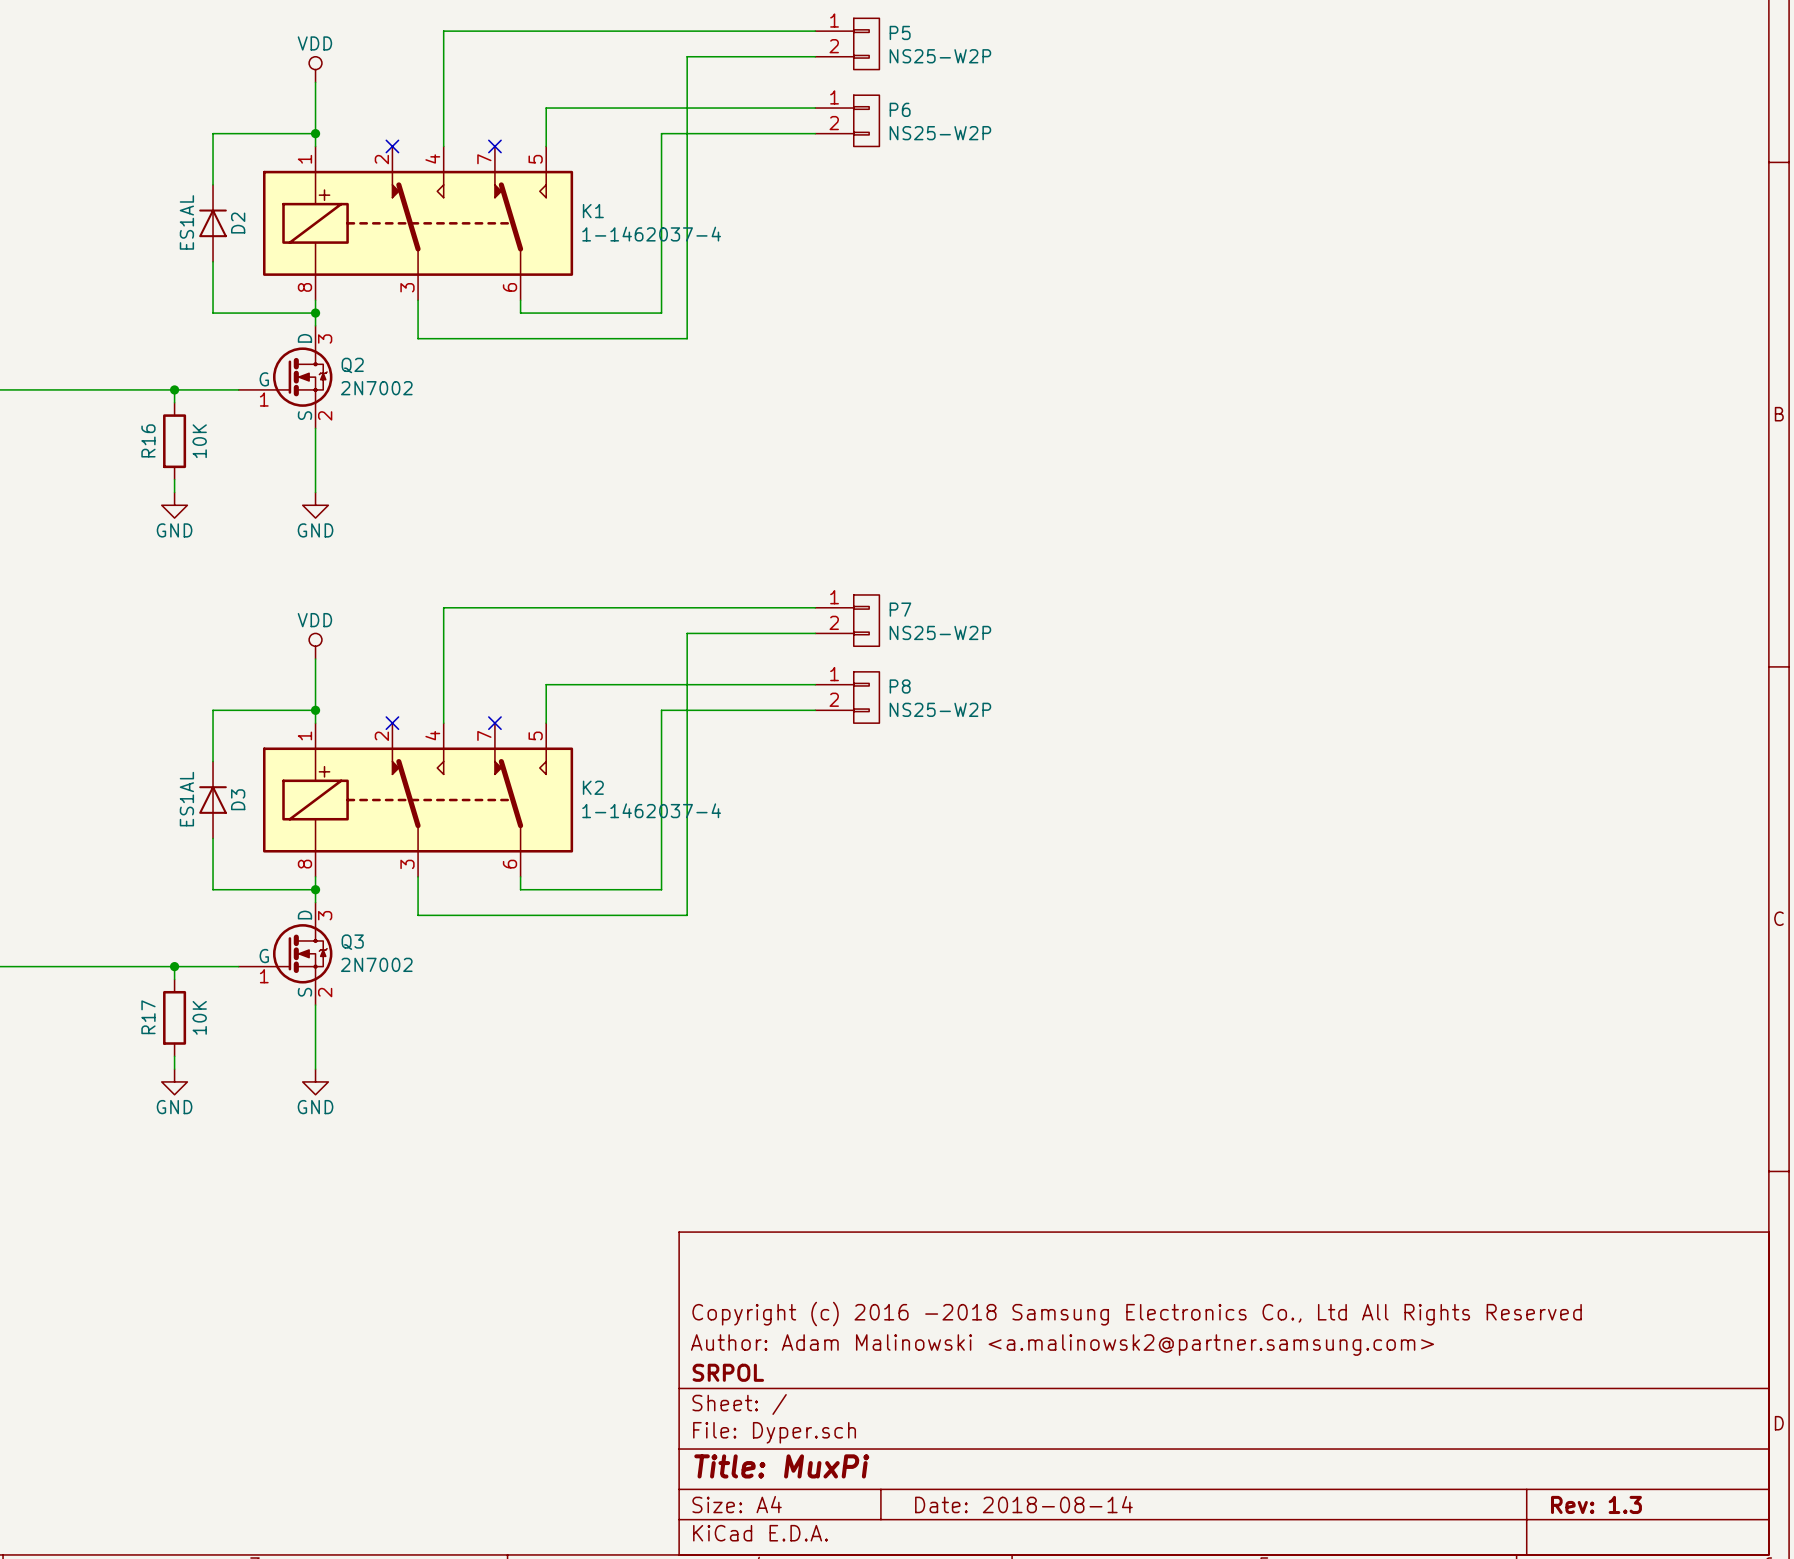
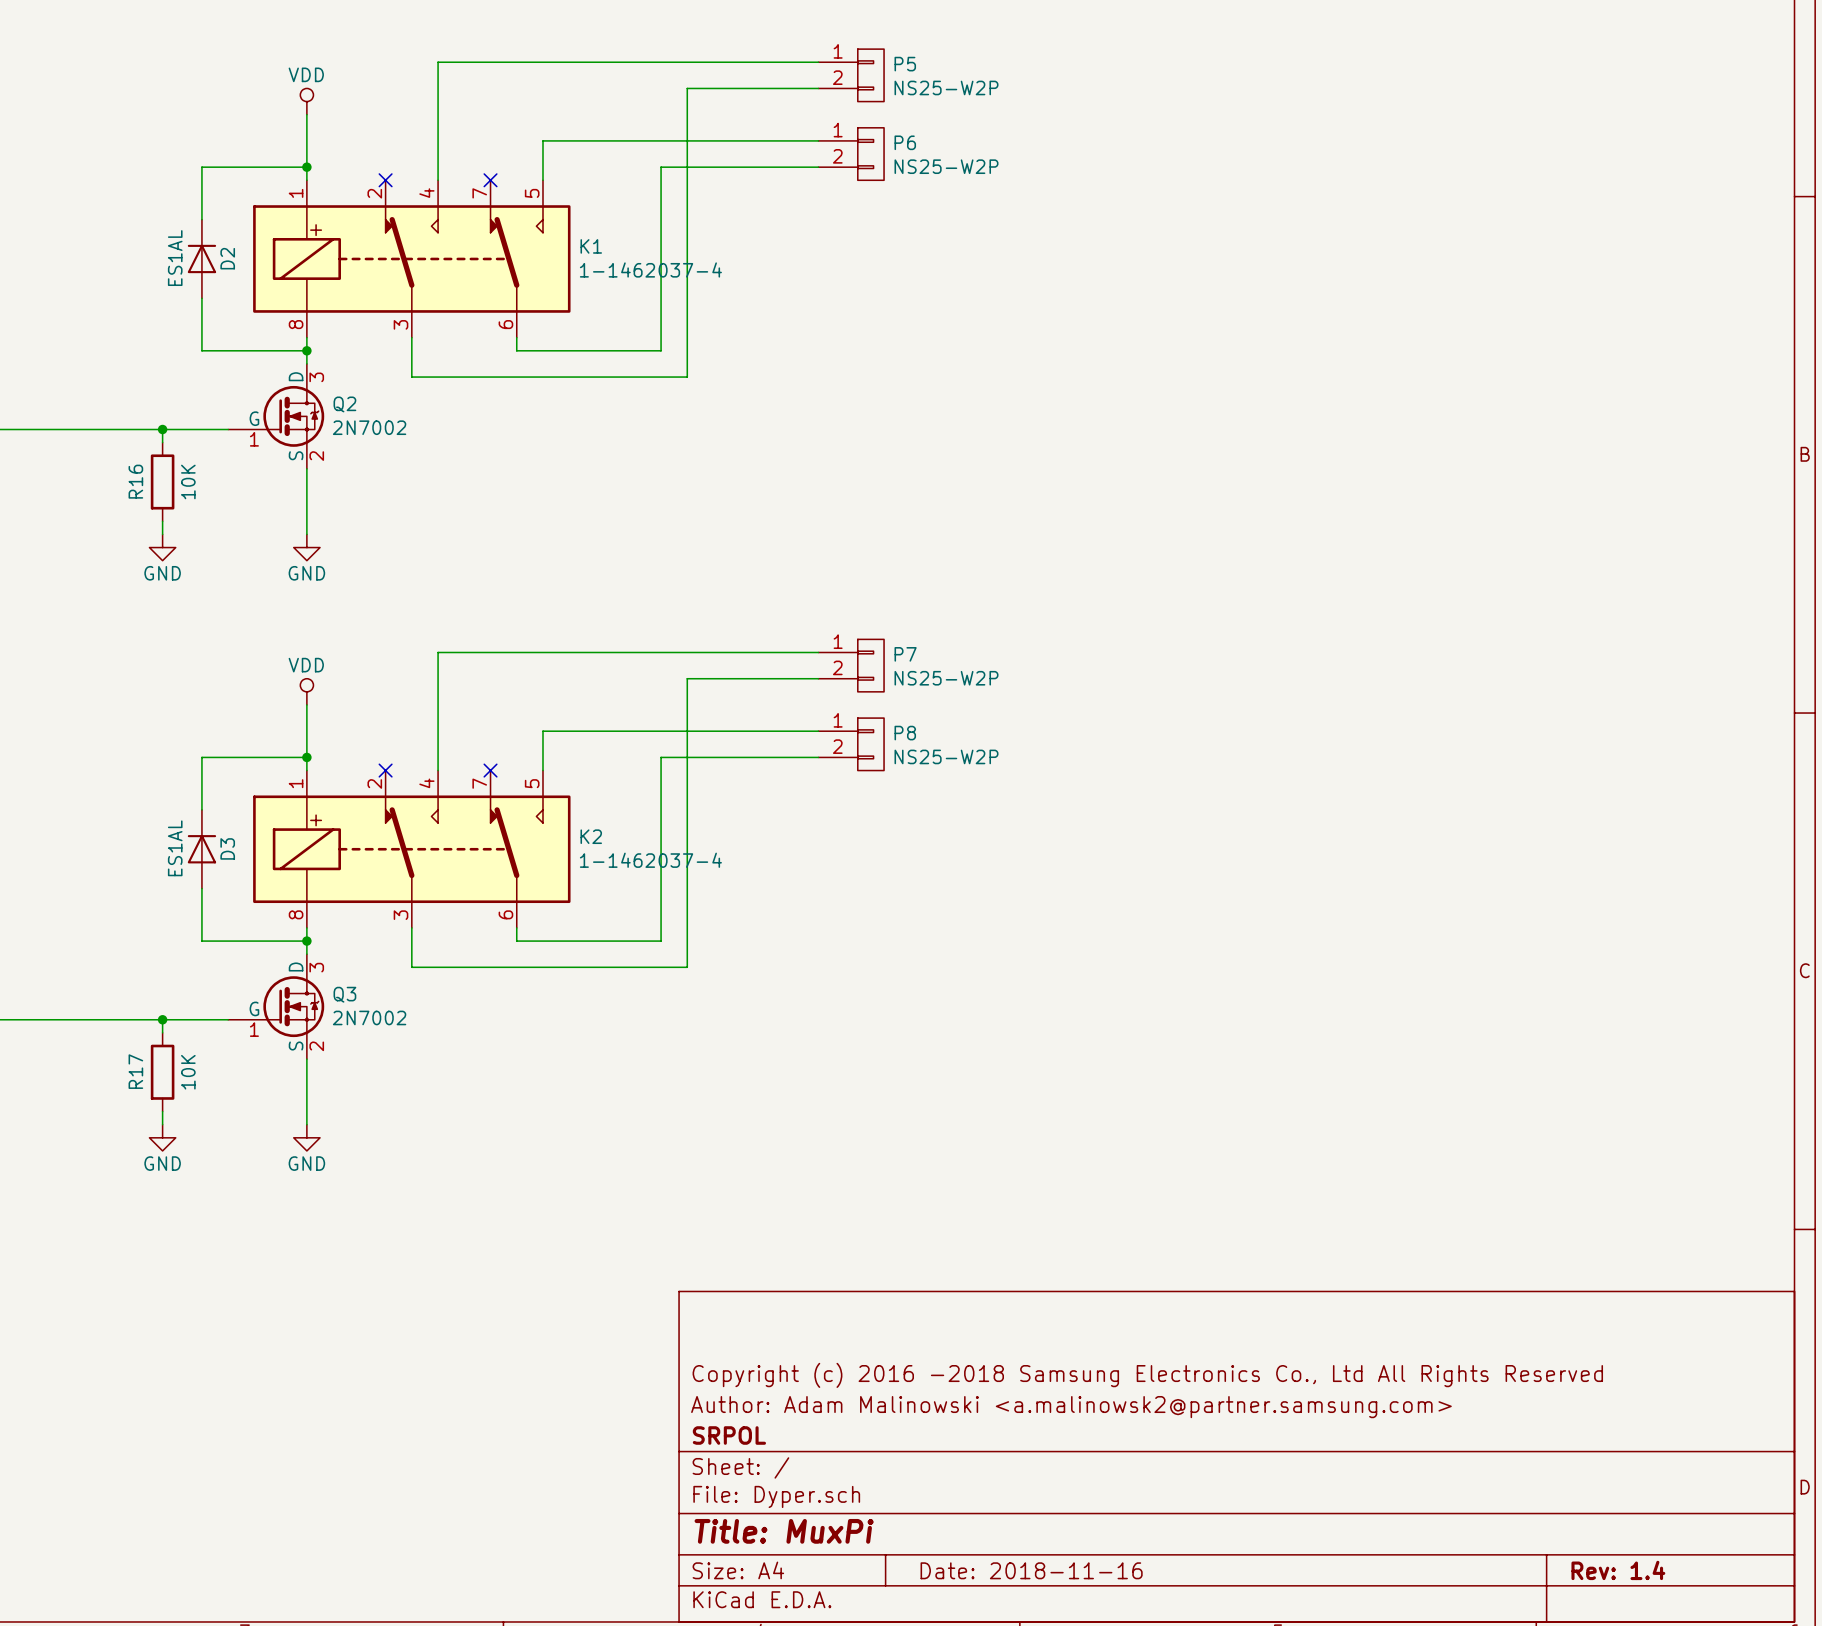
title block: Date: 2018-08-14 (1023, 1504) -> Date: 2018-11-16 (1031, 1570)
title block: Rev: 1.3 (1596, 1504) -> Rev: 1.4 (1618, 1570)

